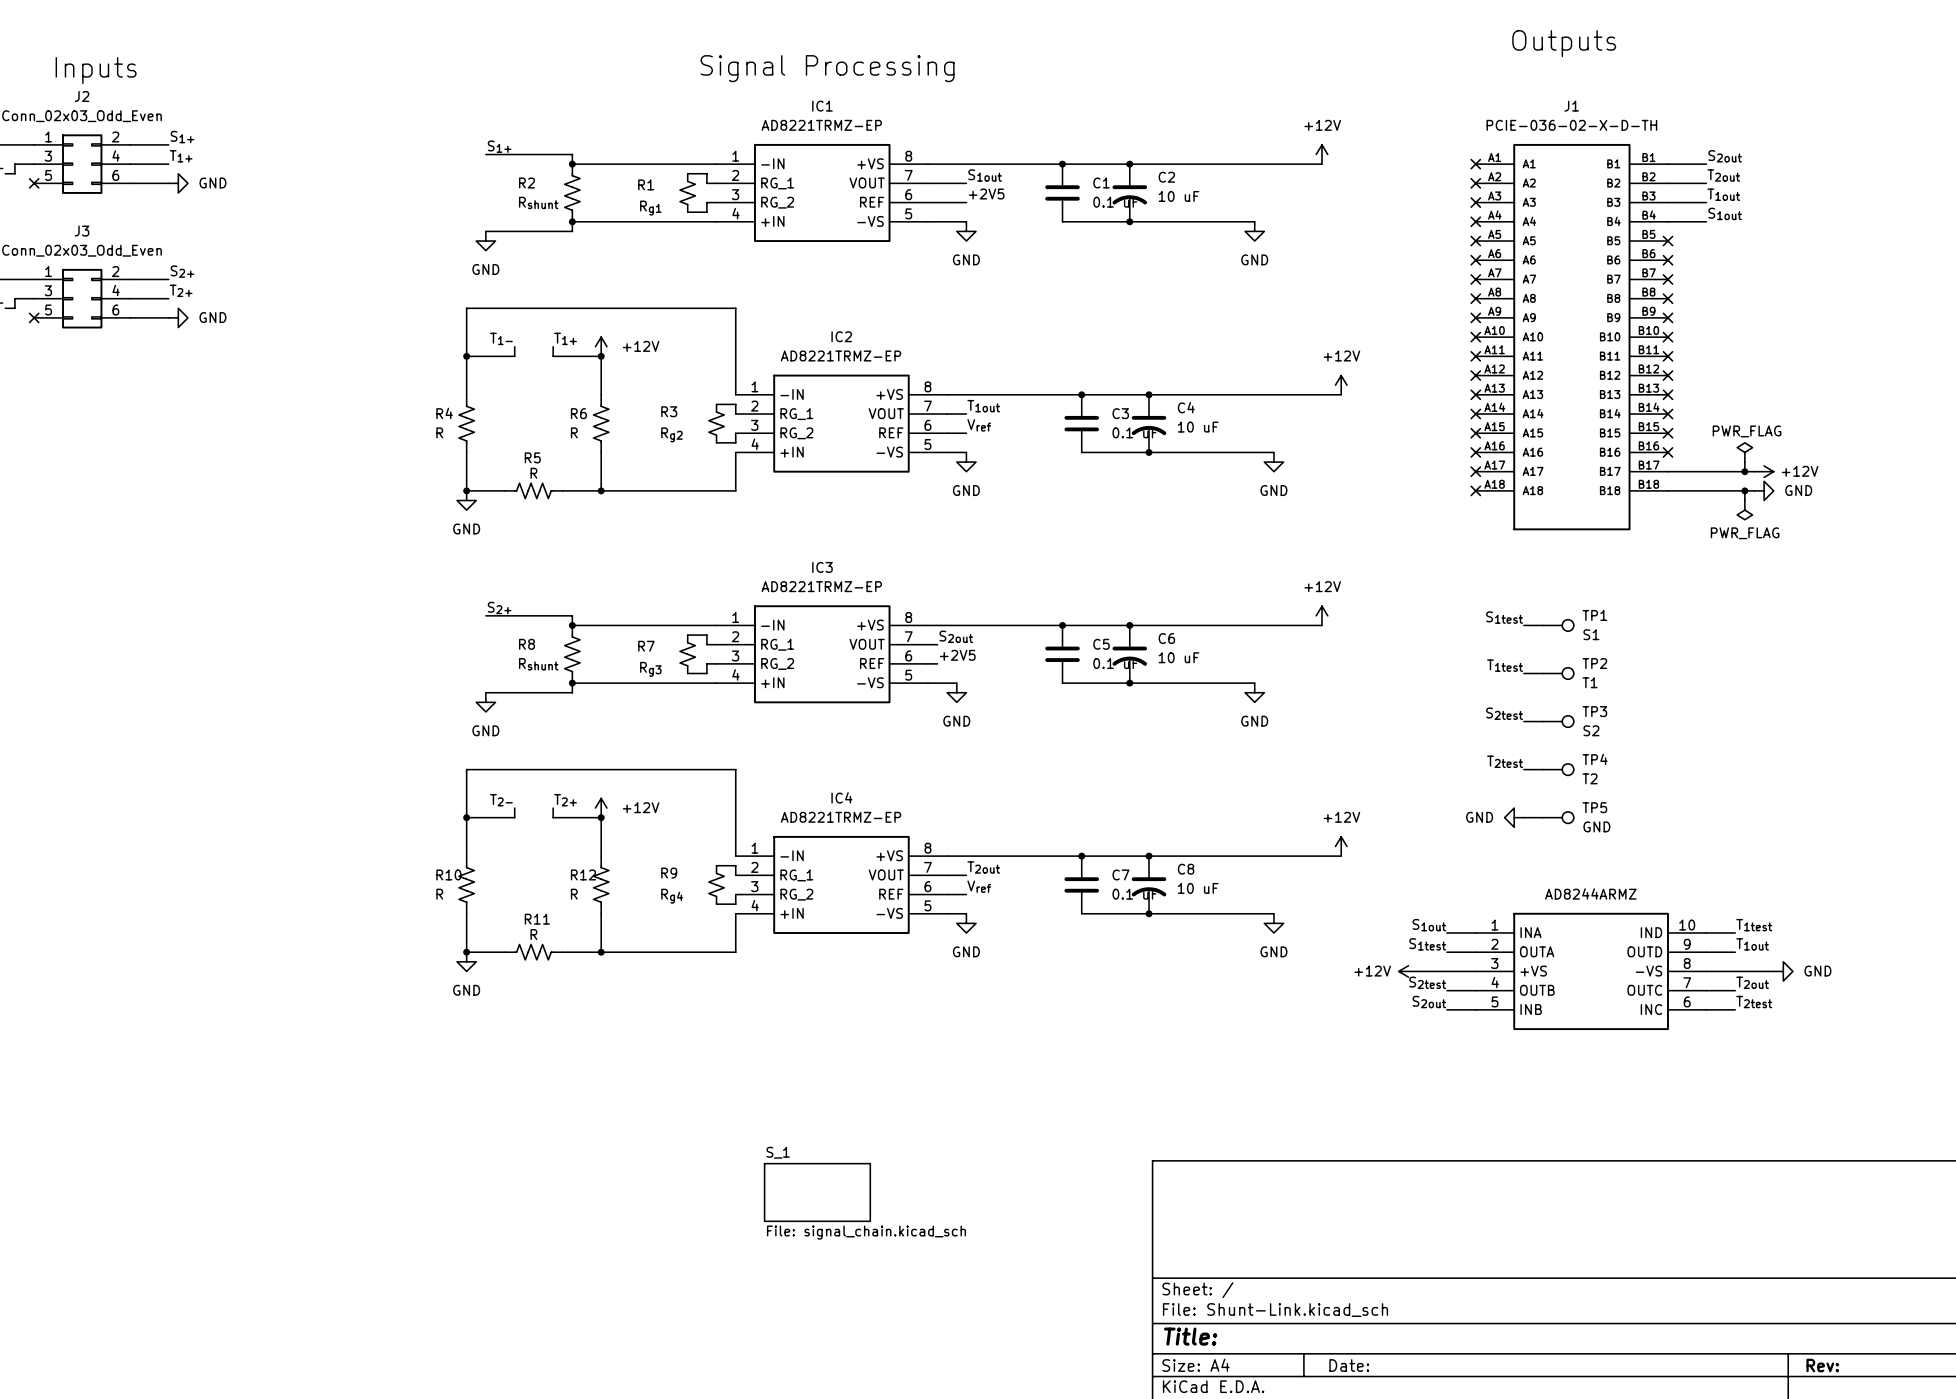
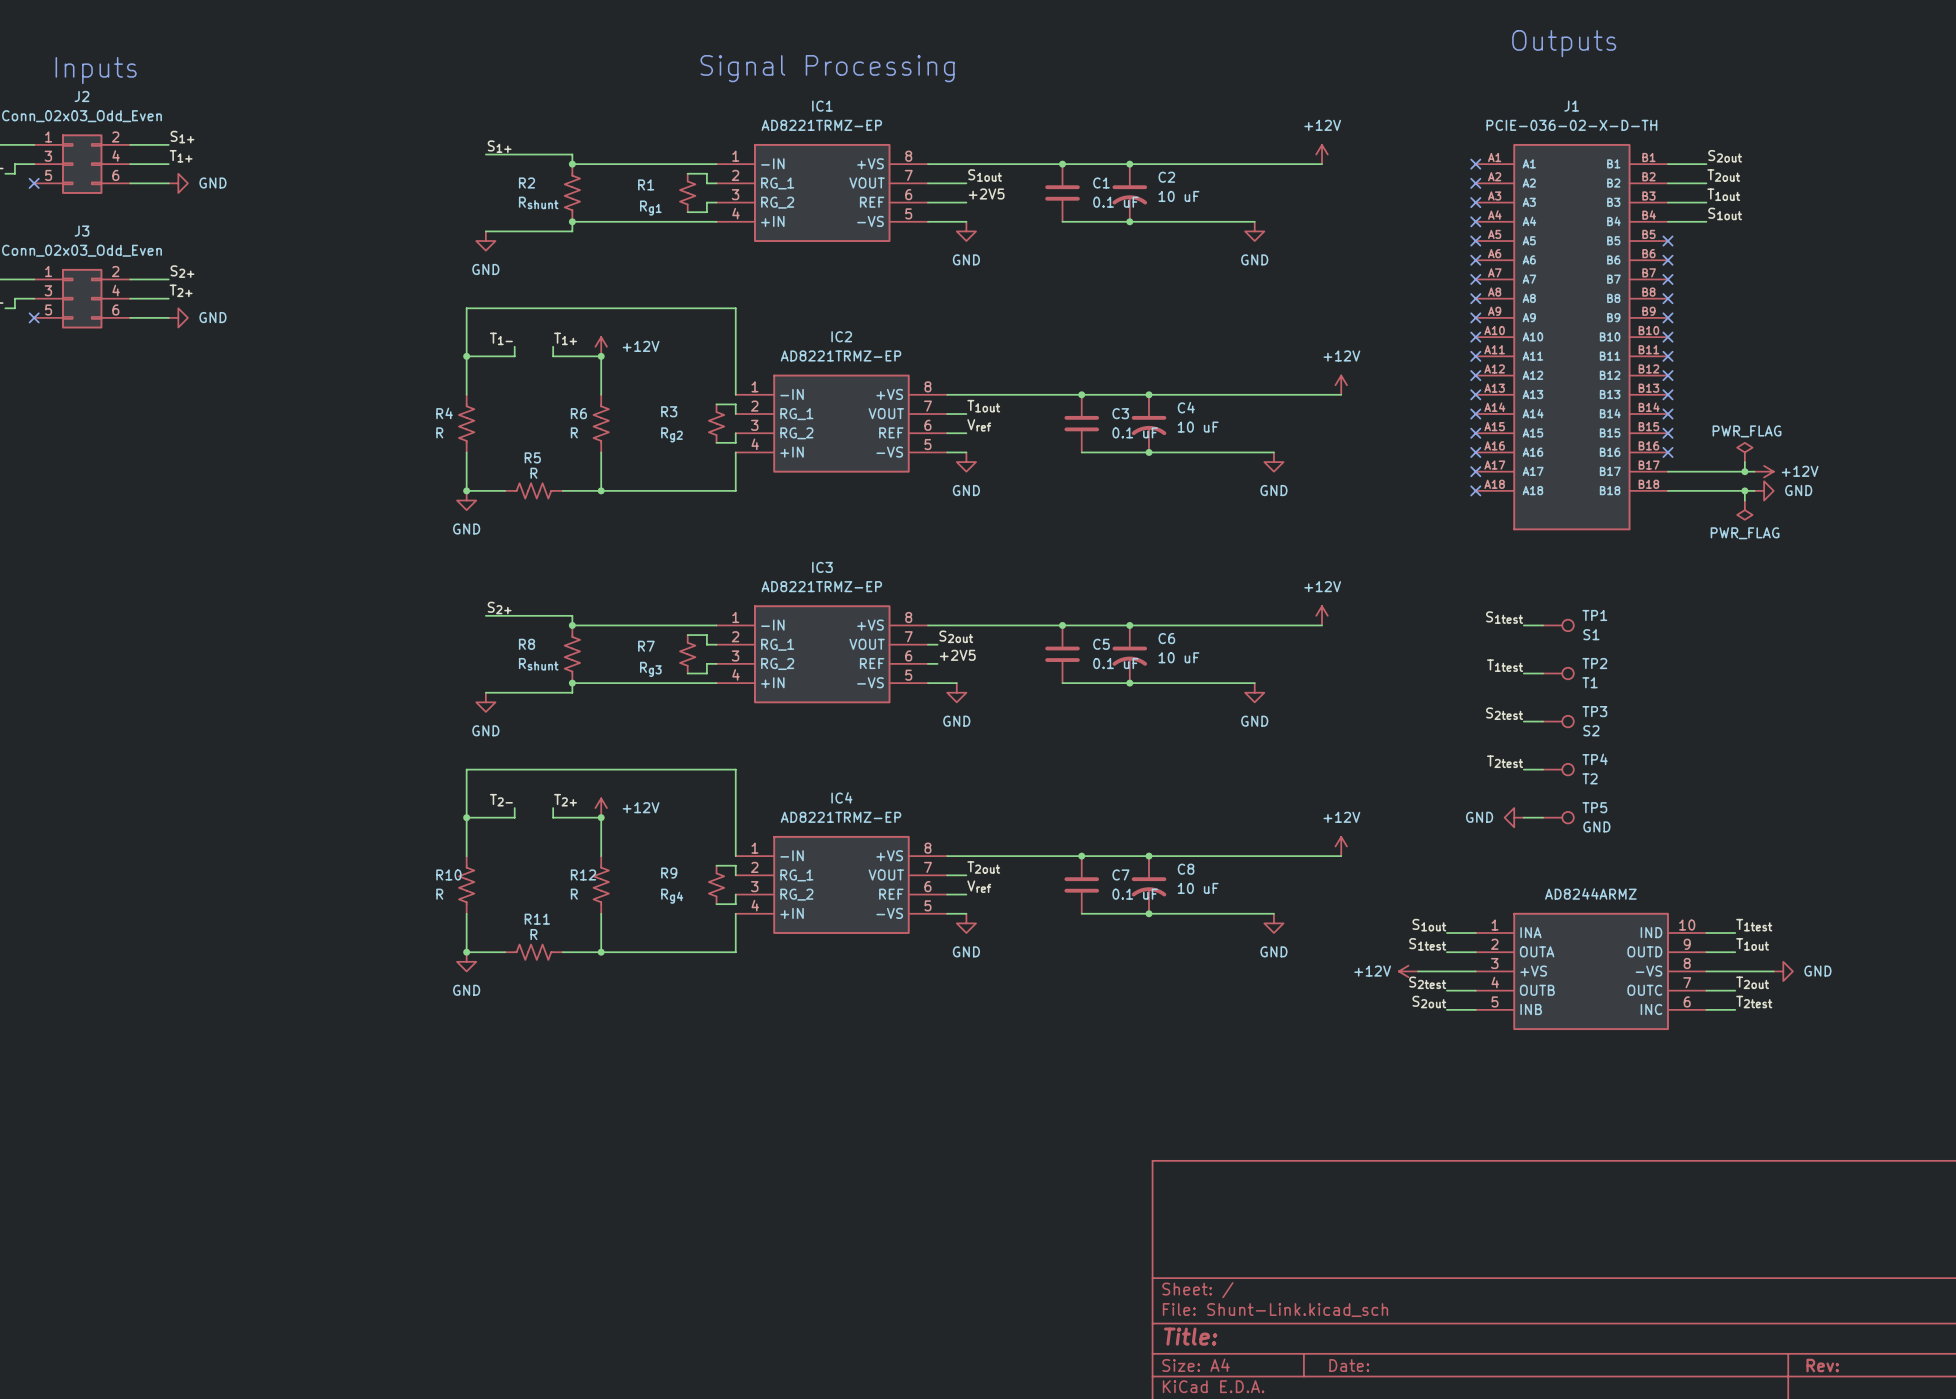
sheet S_1: File: signal_chain.kicad_sch (817, 1192) -> none

